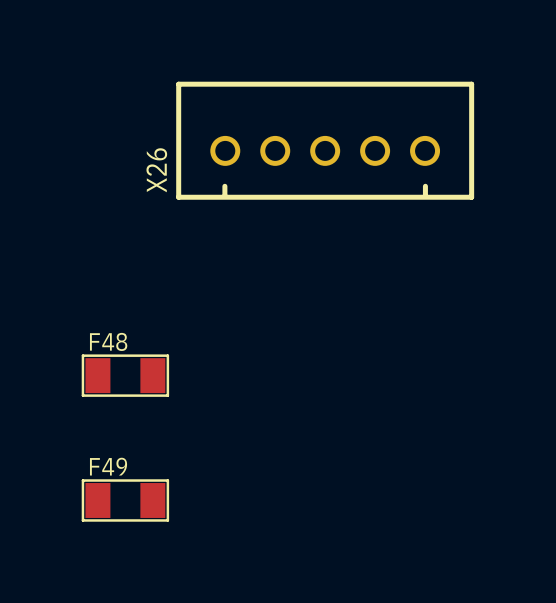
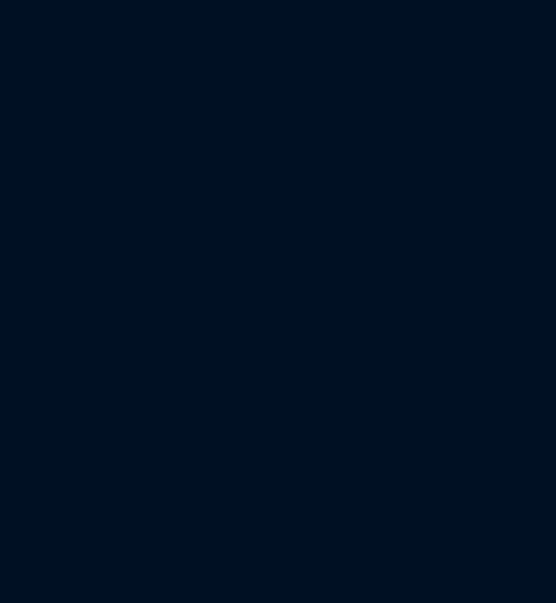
X26: (325, 140) -> none
F48: (125, 375) -> none
F49: (125, 500) -> none

